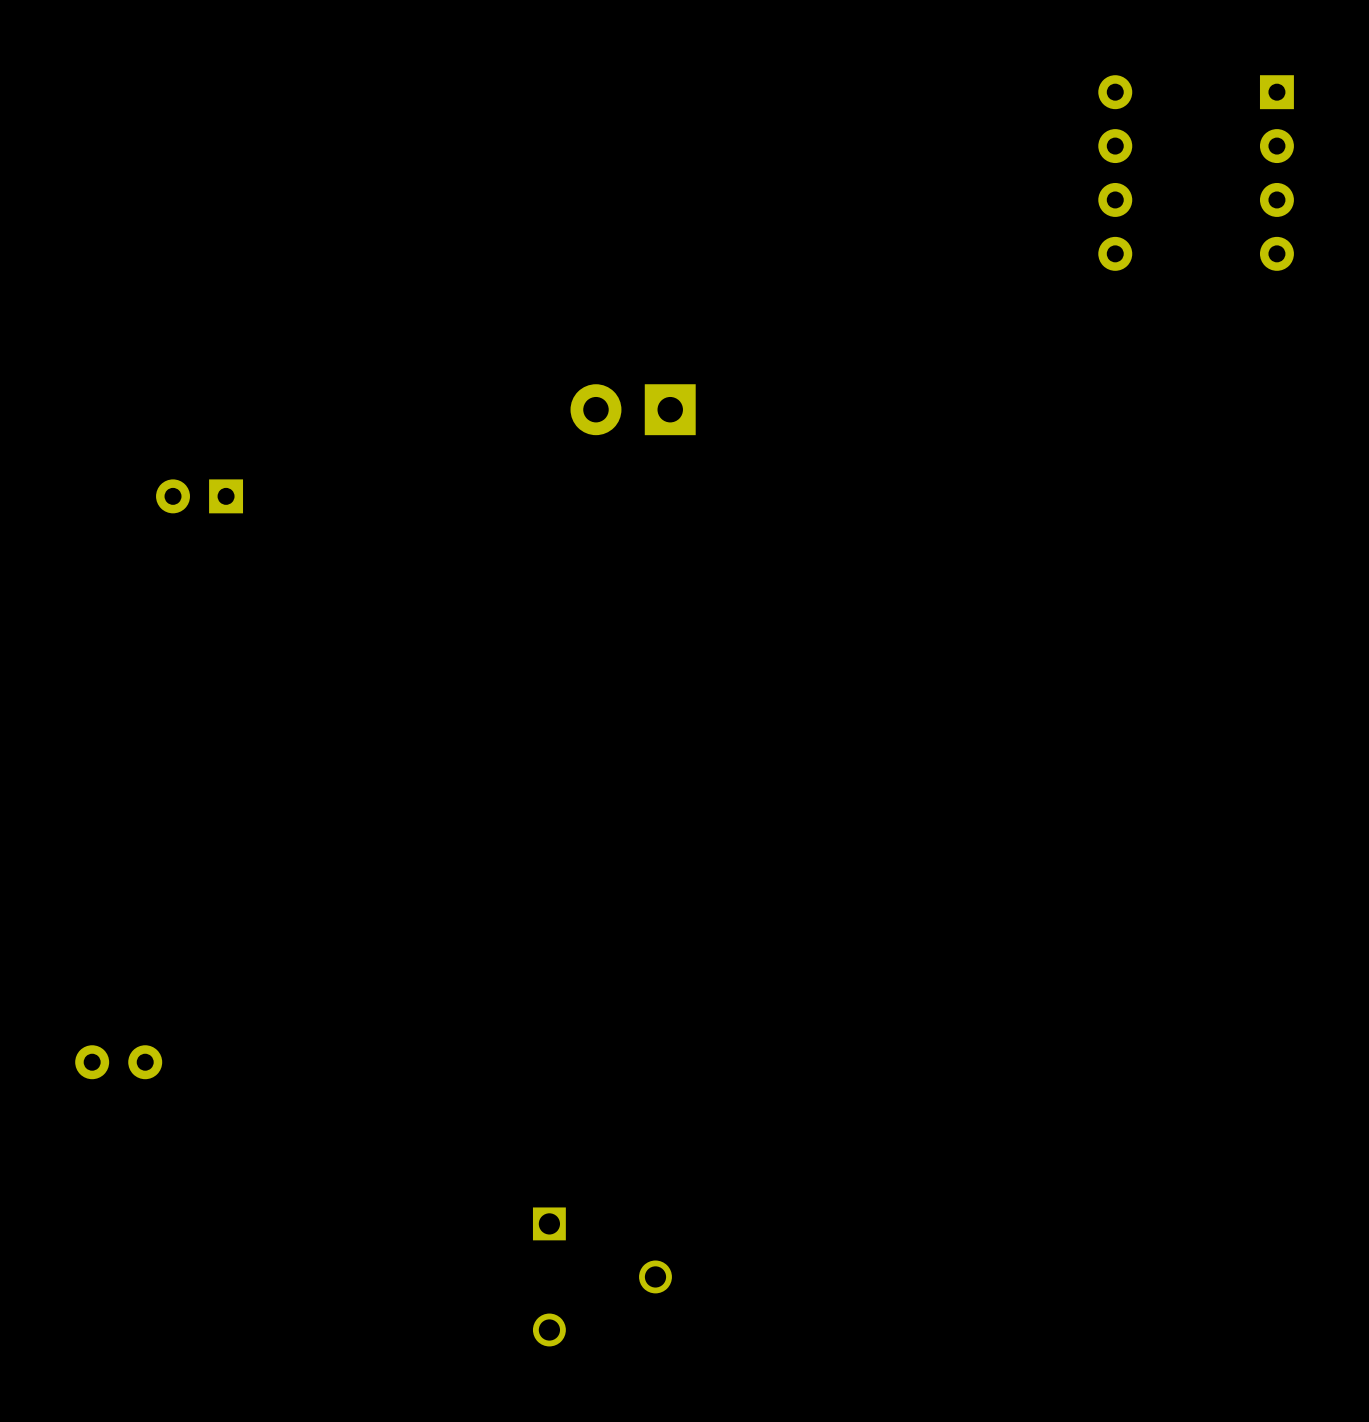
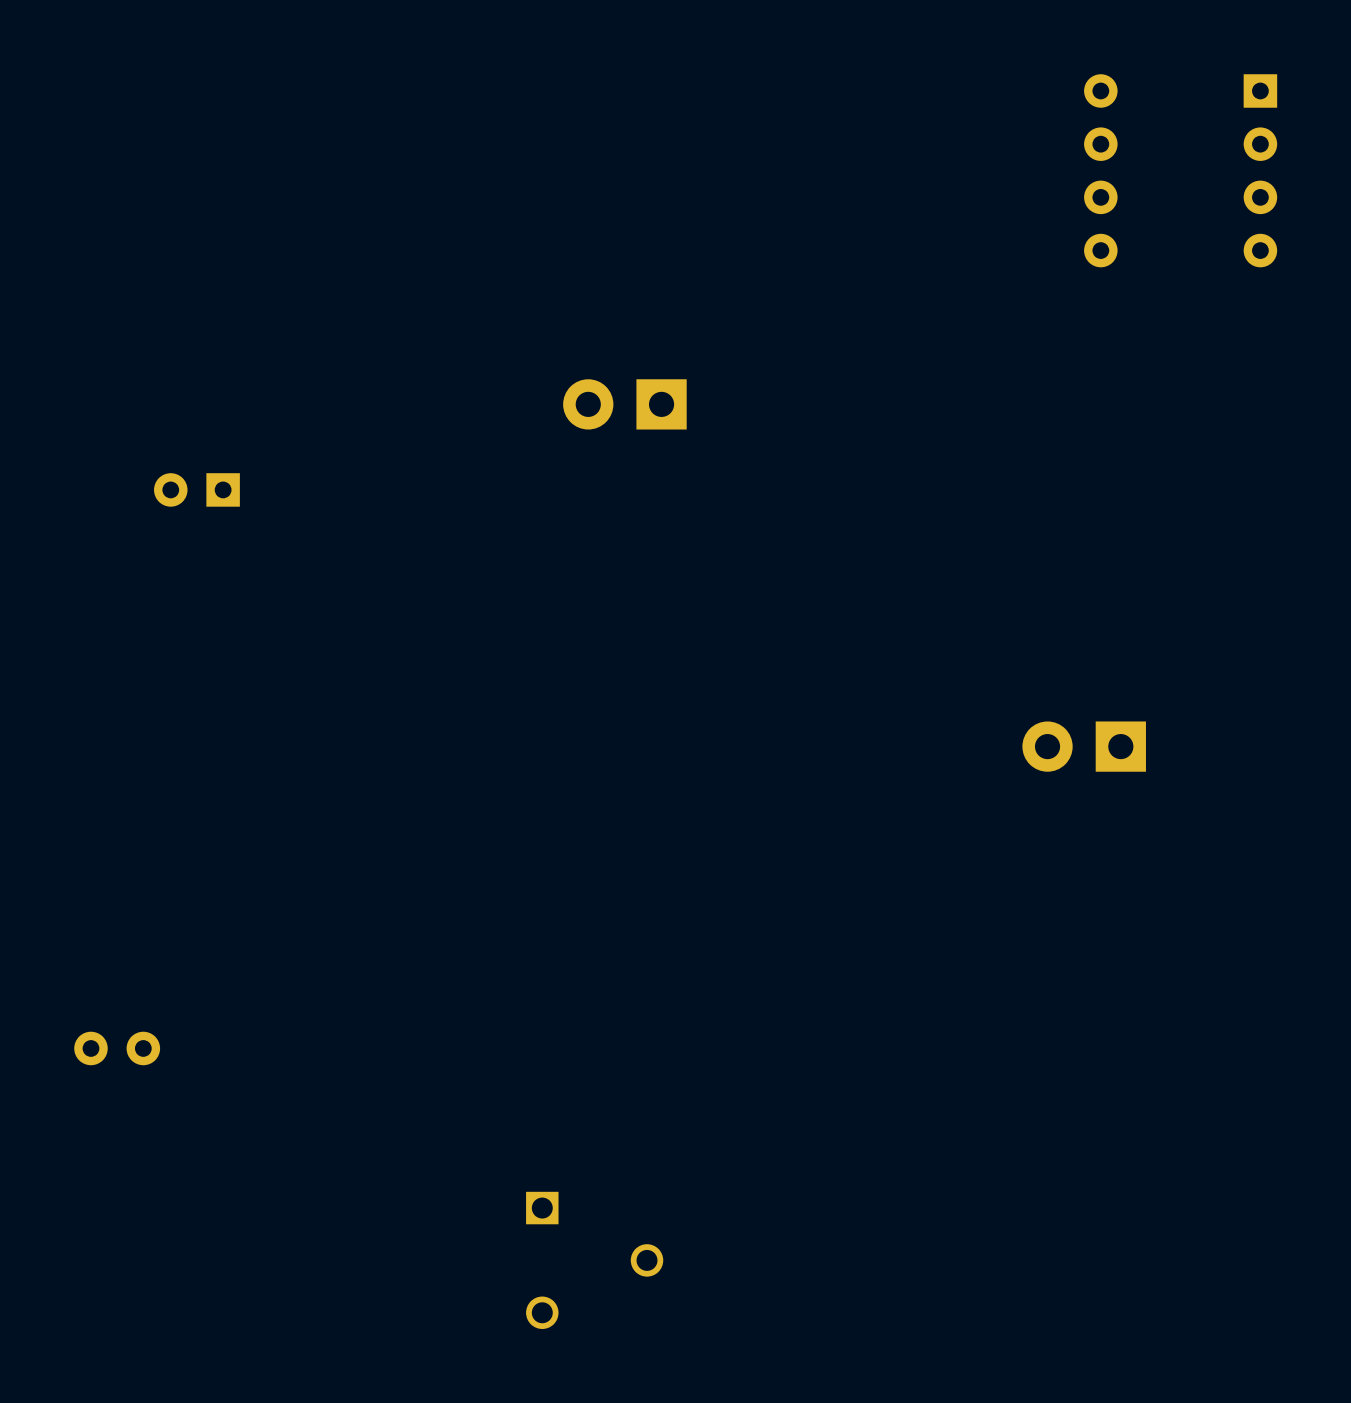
part: none -> (1084, 746)

